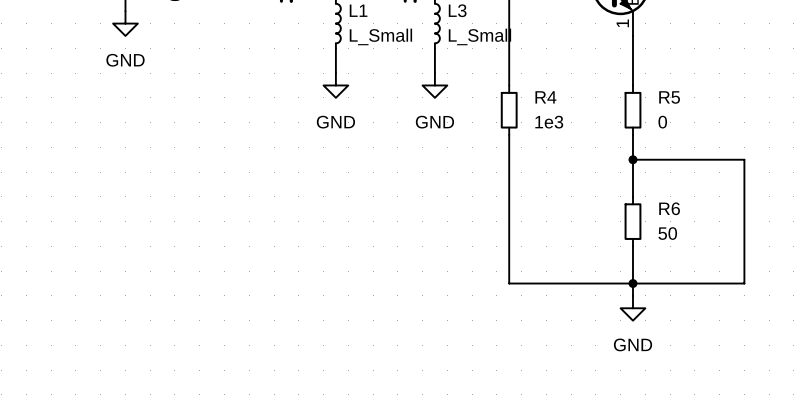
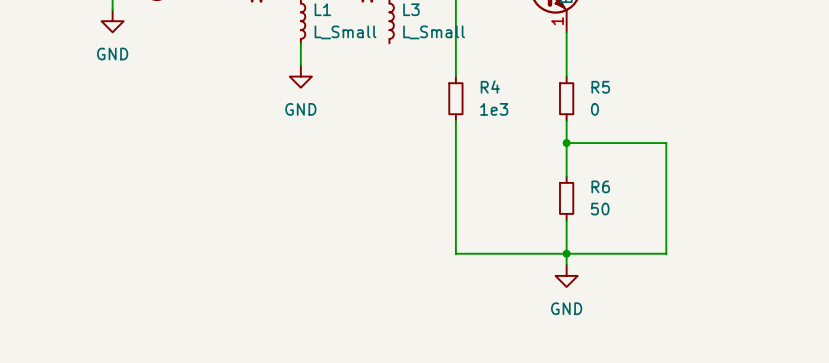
wire: (434, 48) (434, 73) -> none
power symbol: GND (434, 85) -> none

